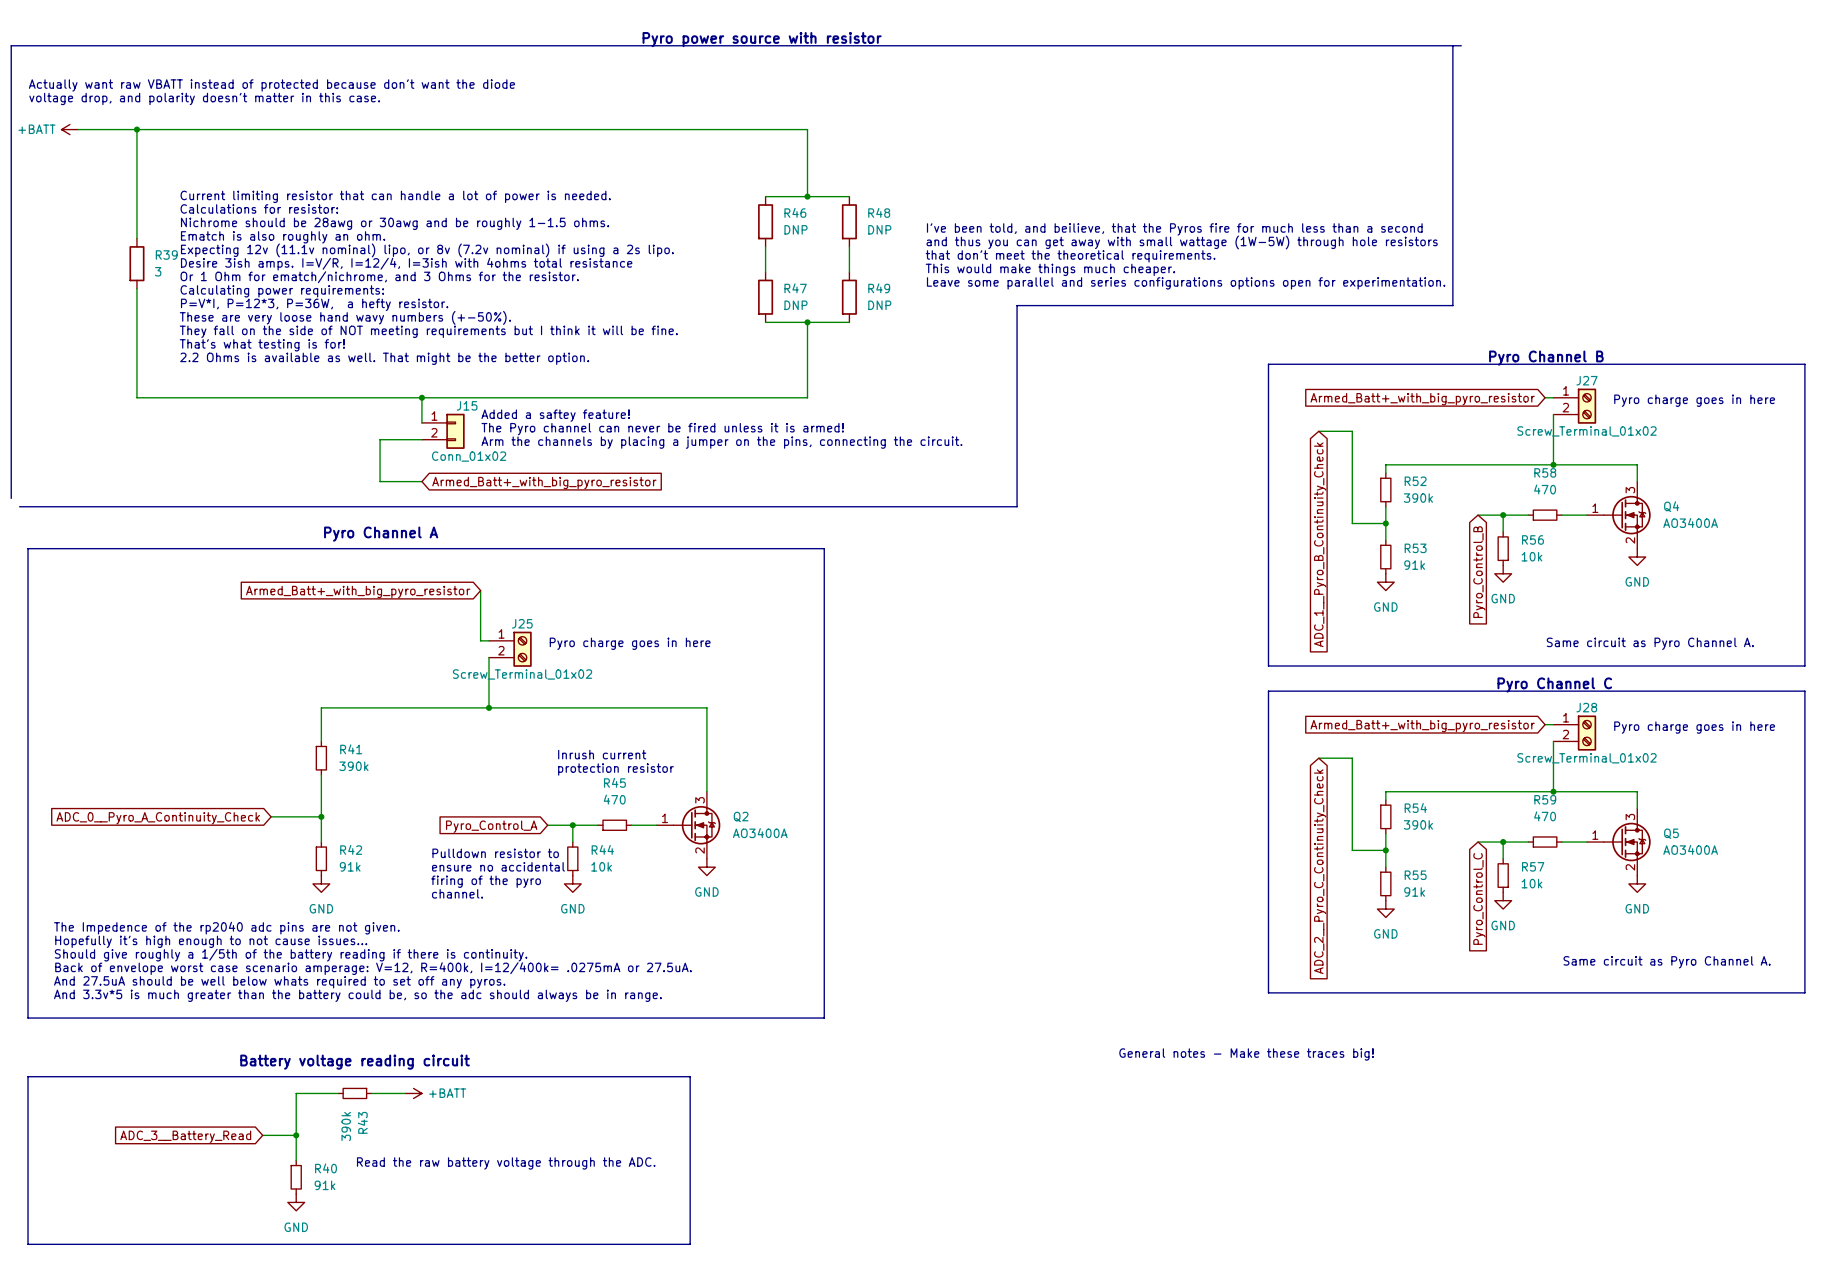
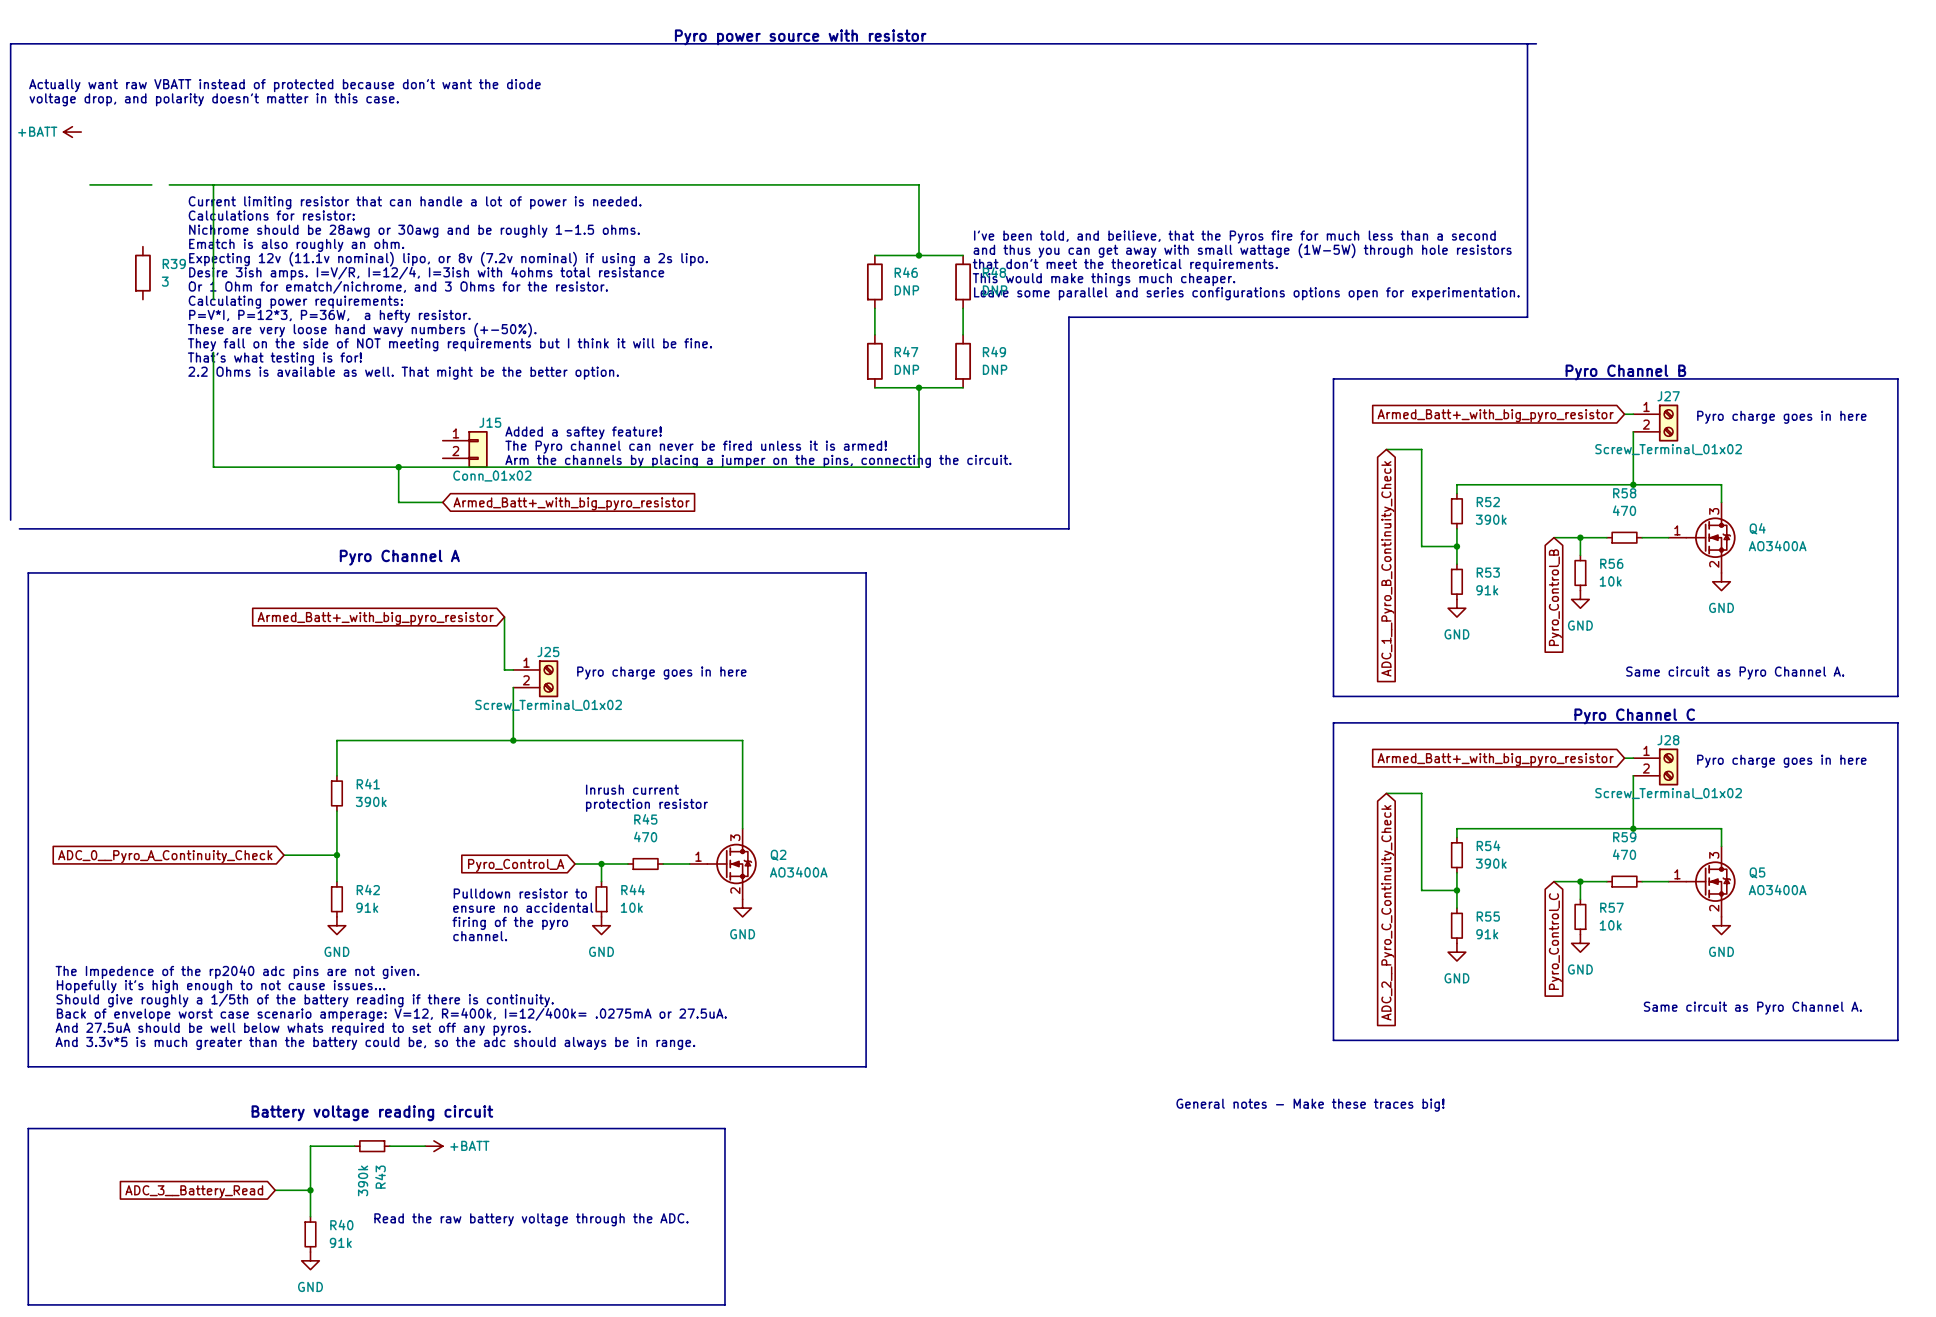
wire: (78, 129) (807, 129) (807, 196) -> none
wire: (136, 129) (136, 238) -> (213, 184) (213, 299)
junction: (136, 129) -> none
wire: none -> (90, 184) (151, 184)
wire: none -> (169, 184) (918, 184) (918, 255)
wire: (765, 196) (849, 196) -> (874, 255) (963, 255)
junction: (807, 196) -> none
R46 position: (765, 221) -> (874, 281)
R48 position: (849, 221) -> (963, 281)
wire: (765, 246) (765, 272) -> (874, 308) (874, 334)
wire: (849, 246) (849, 272) -> (963, 308) (963, 334)
junction: none -> (918, 255)
wire: (136, 288) (136, 397) (807, 397) (807, 322) -> (213, 352) (213, 467) (918, 467) (918, 387)
R47 position: (765, 297) -> (874, 361)
R49 position: (849, 297) -> (963, 361)
wire: (765, 322) (849, 322) -> (874, 387) (963, 387)
junction: (807, 322) -> none
junction: none -> (918, 387)
wire: (421, 397) (421, 422) -> none
junction: (421, 397) -> none
wire: (421, 439) (380, 439) (380, 448) -> none
junction: none -> (398, 467)

